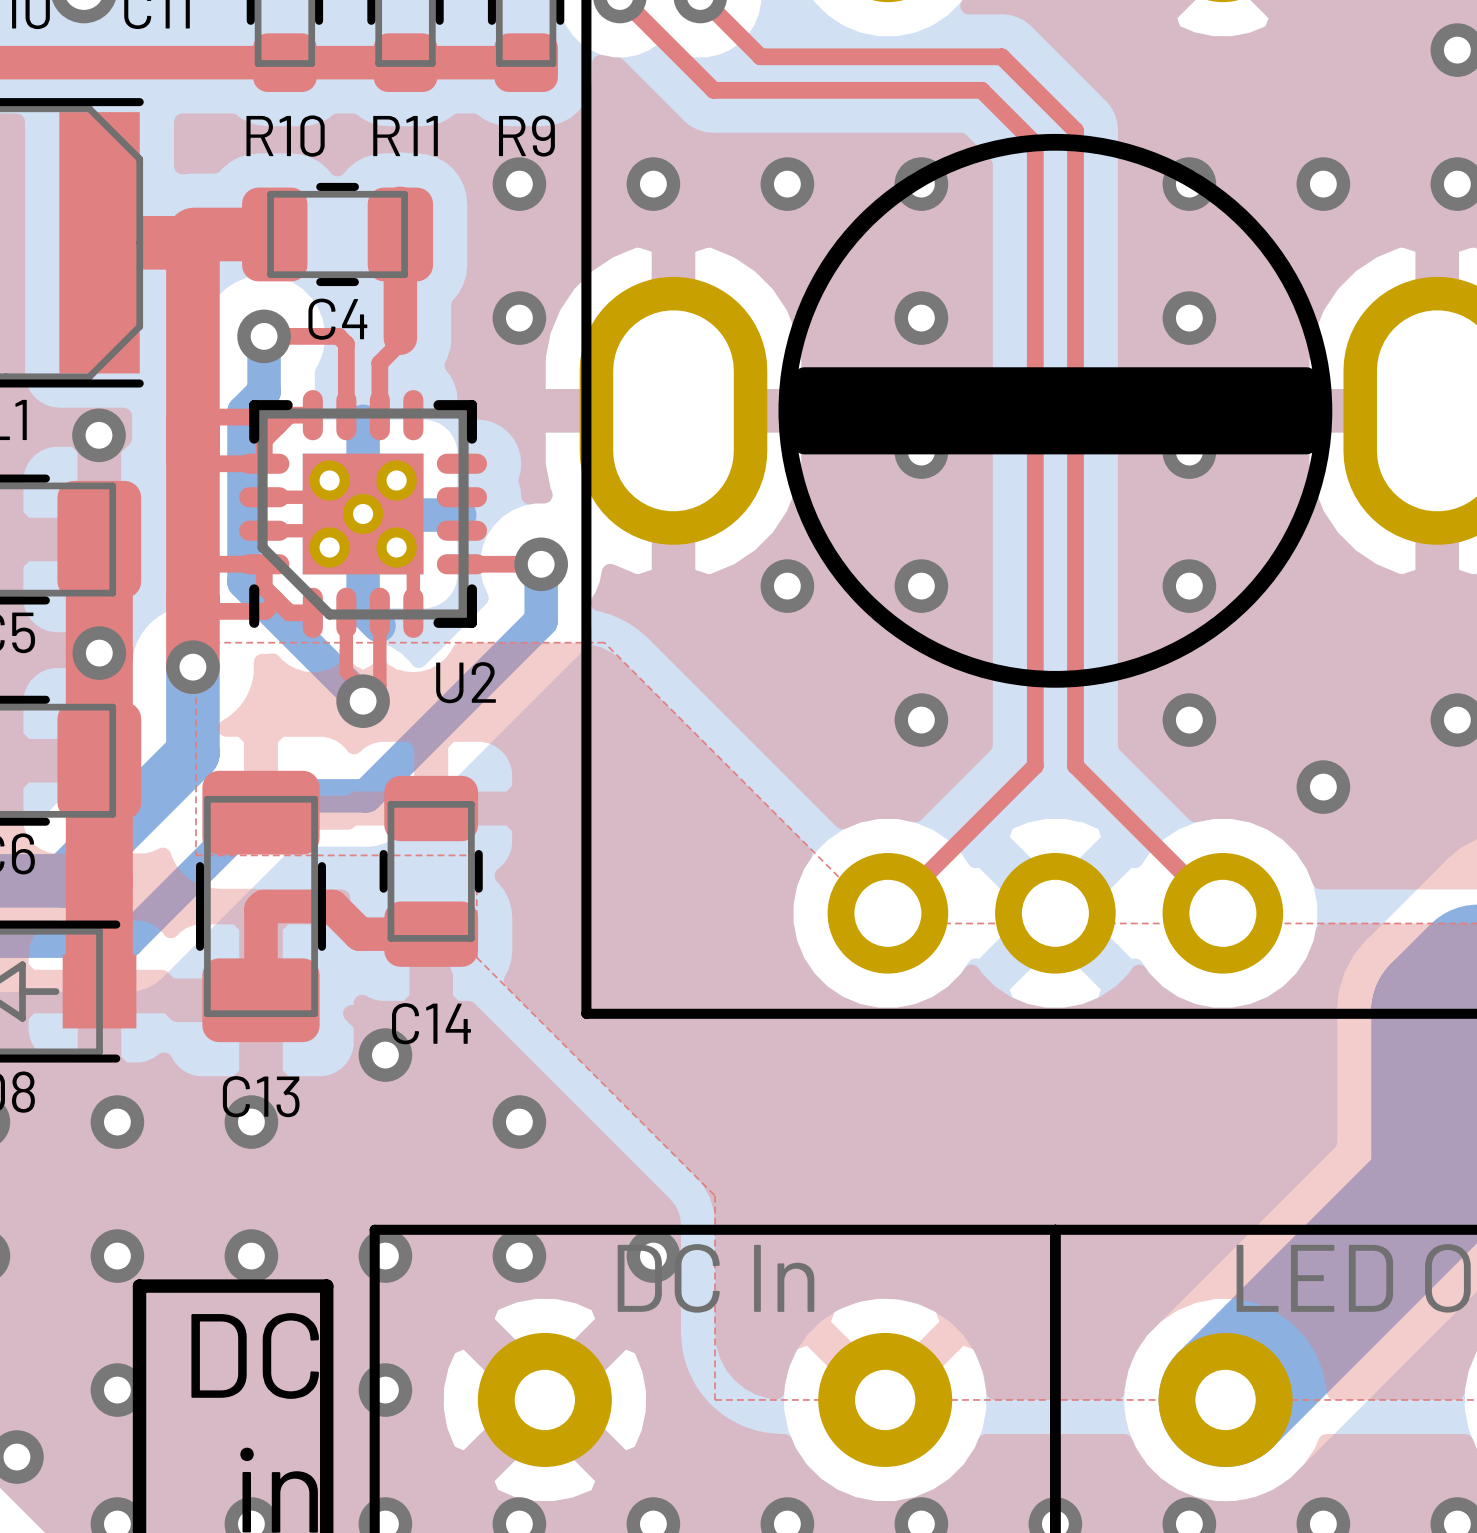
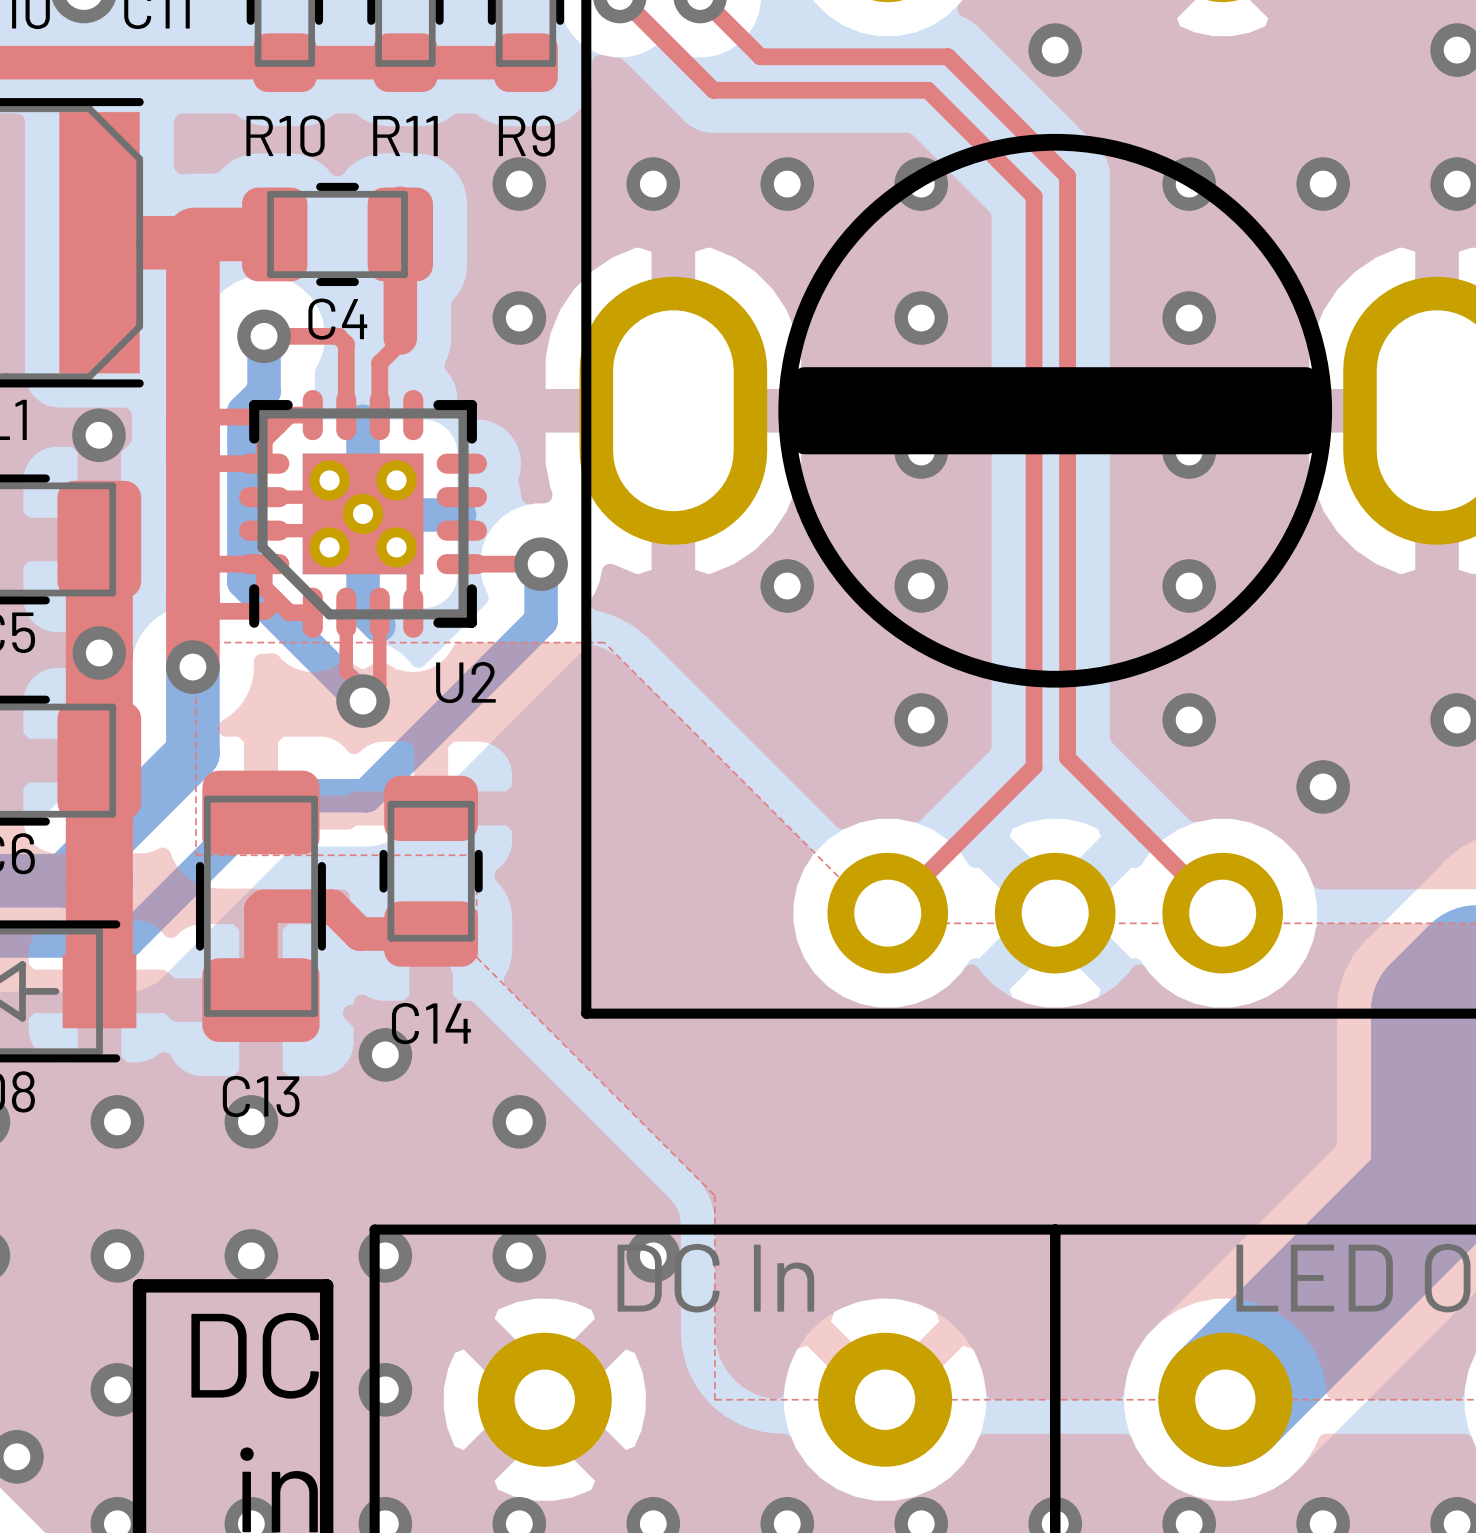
via: none -> (1055, 50)
top track: (948, 56) (1001, 56) (1075, 130) (1075, 765) -> none
top track: (928, 90) (981, 90) -> (948, 56) (981, 90)
top track: none -> (927, 90) (1034, 196) (1034, 766)
top track: (1035, 143) (1034, 766) -> (1035, 143) (1067, 176) (1067, 758) (1075, 765)

